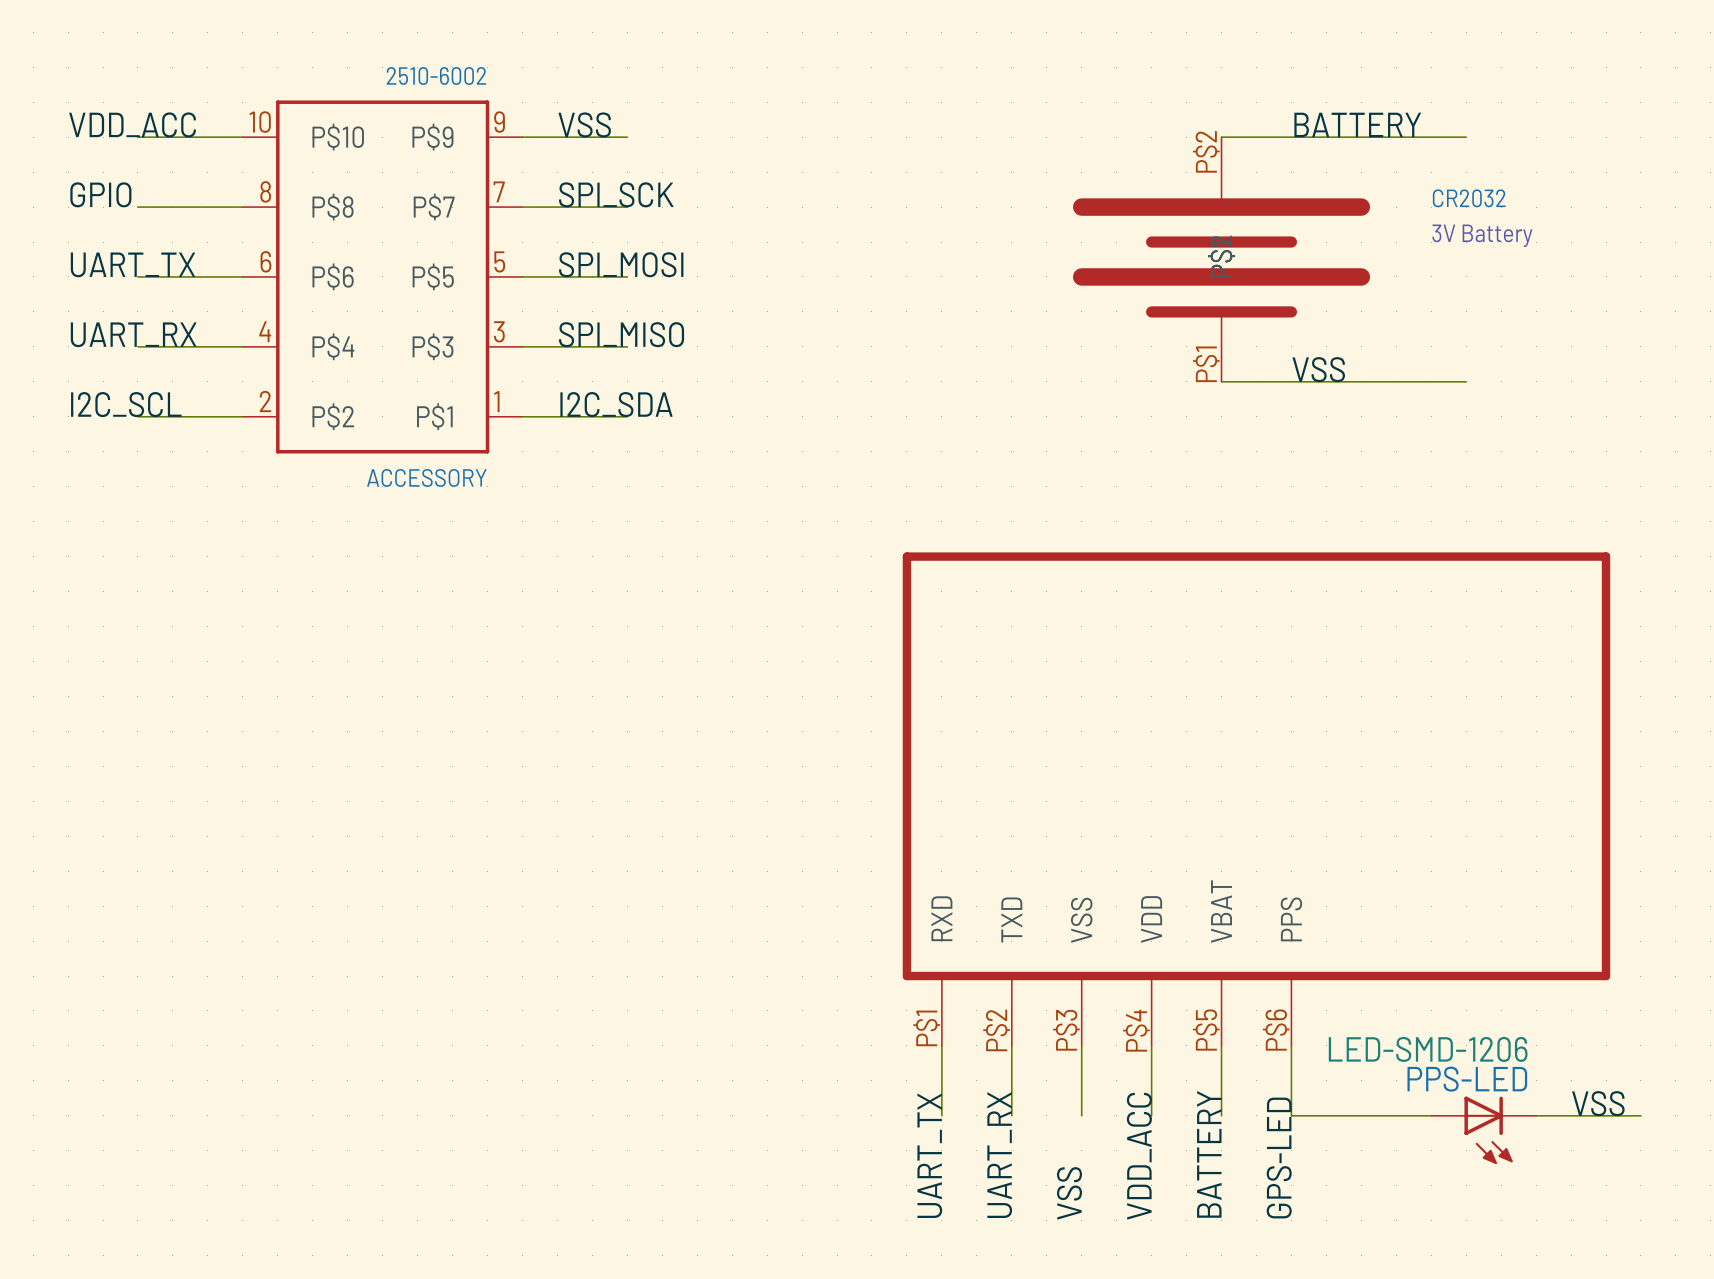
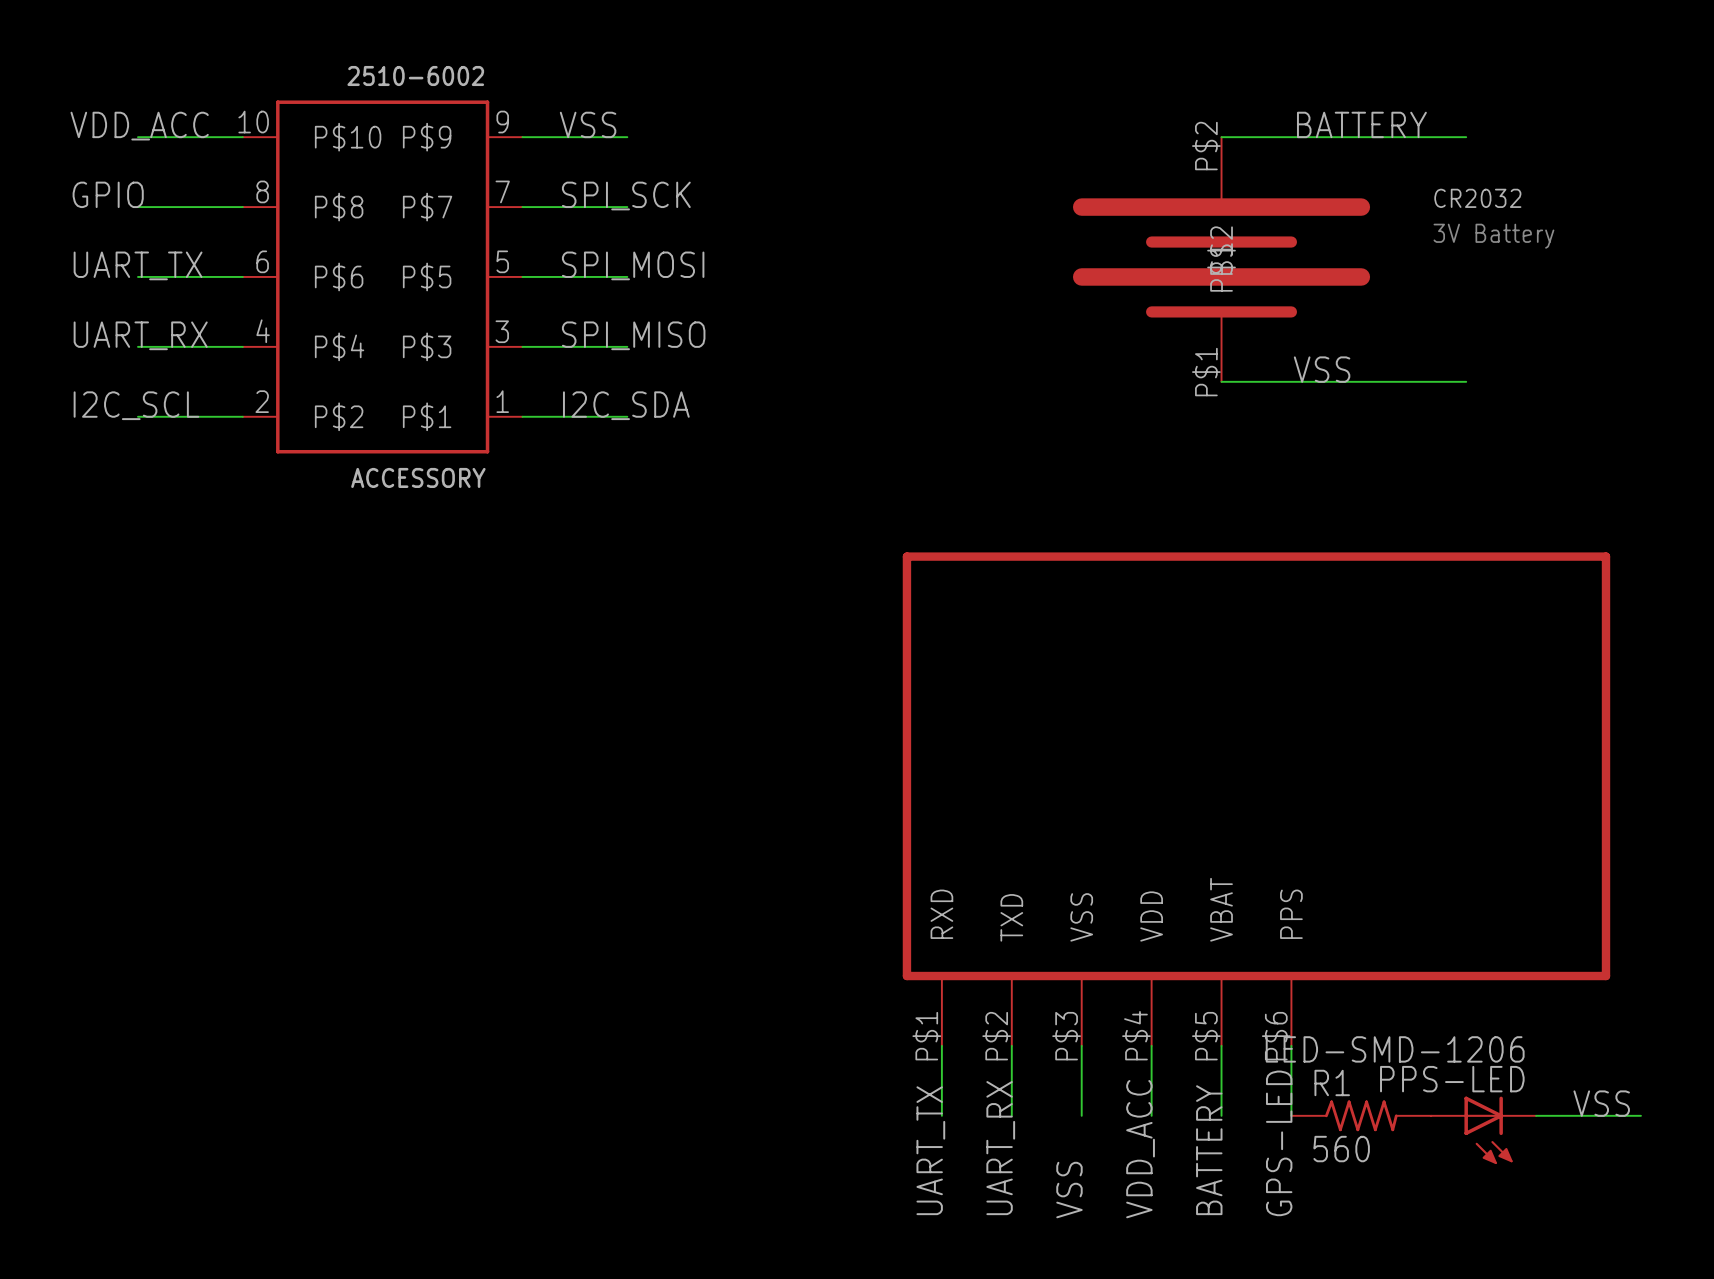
R1: none -> 560 (1361, 1115)

